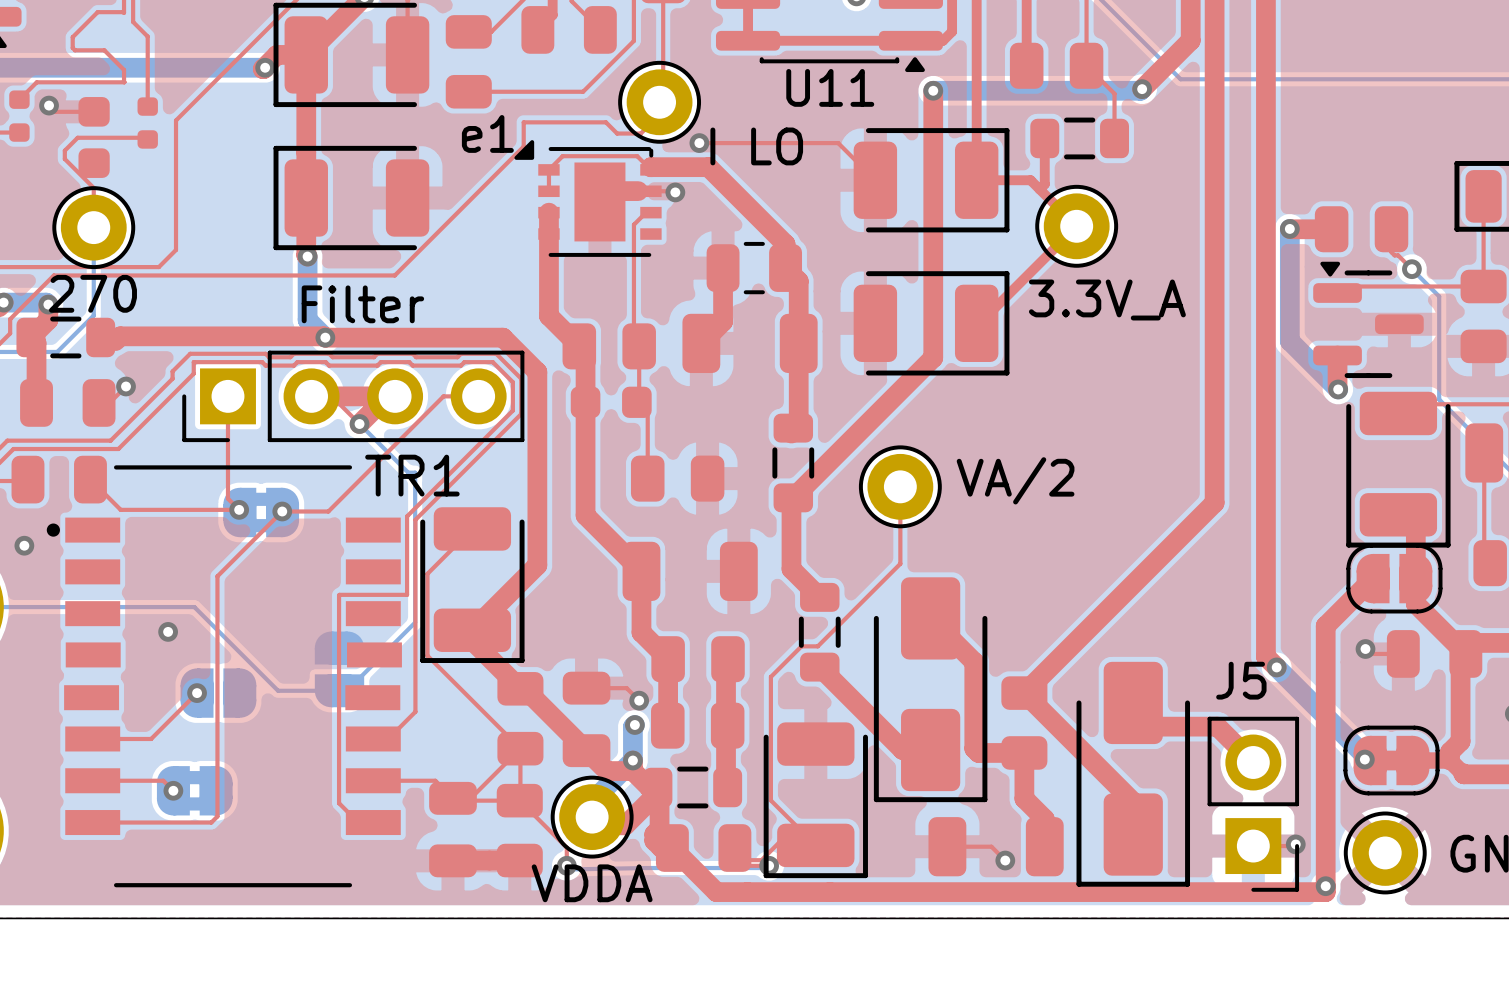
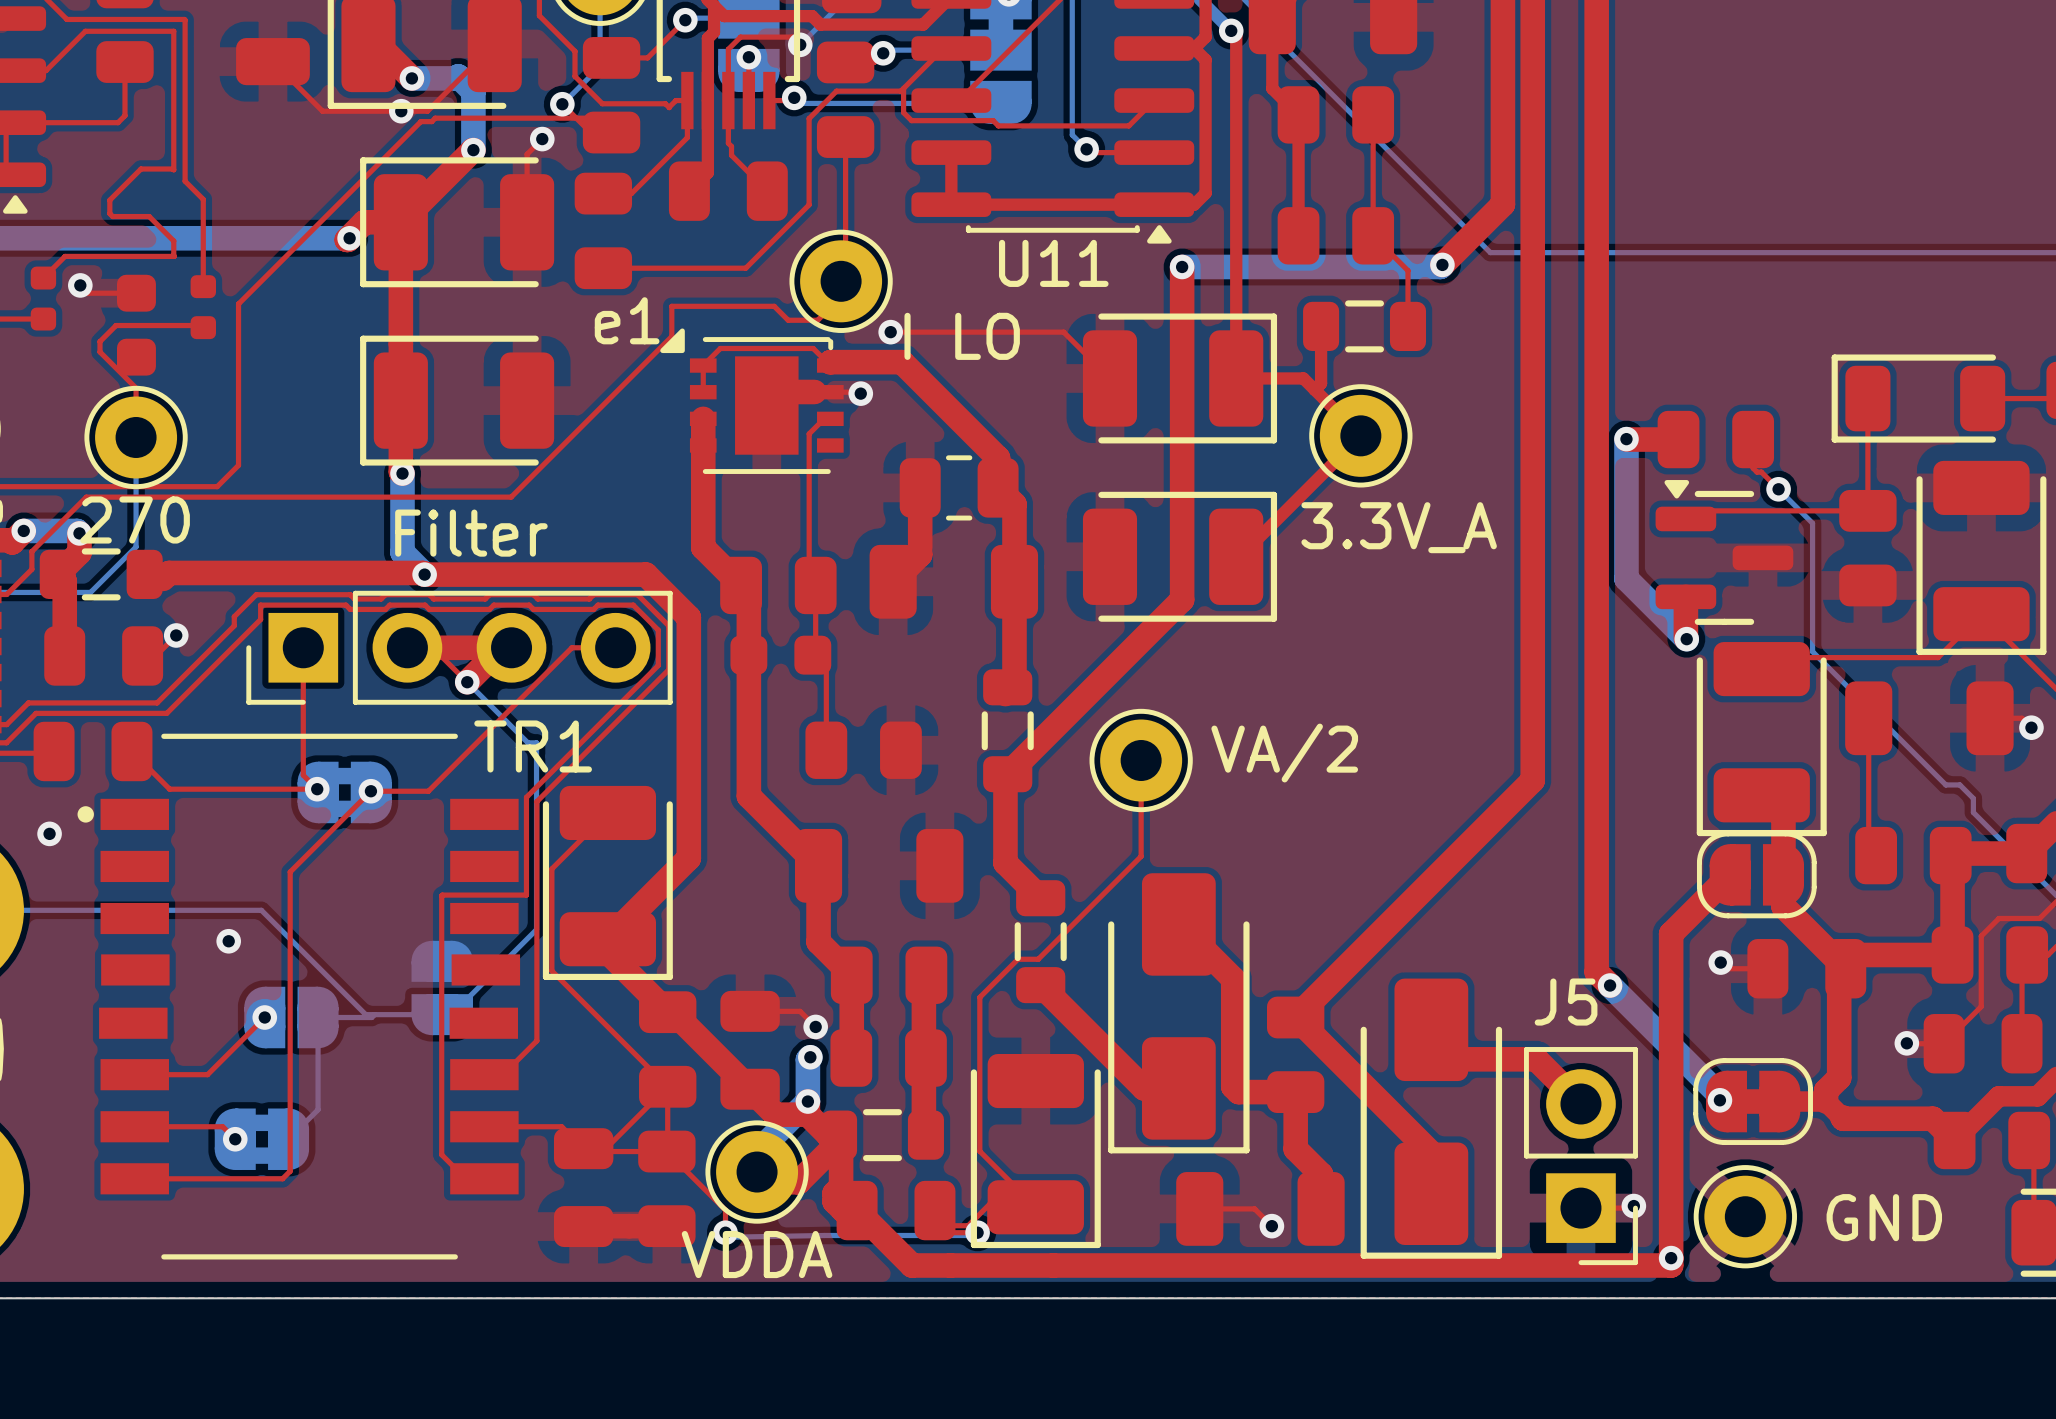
bottom track: none -> (374, 1014) (371, 1017) (315, 1017) (312, 1019)
bottom track: none -> (318, 1017) (318, 1109) (288, 1139)

